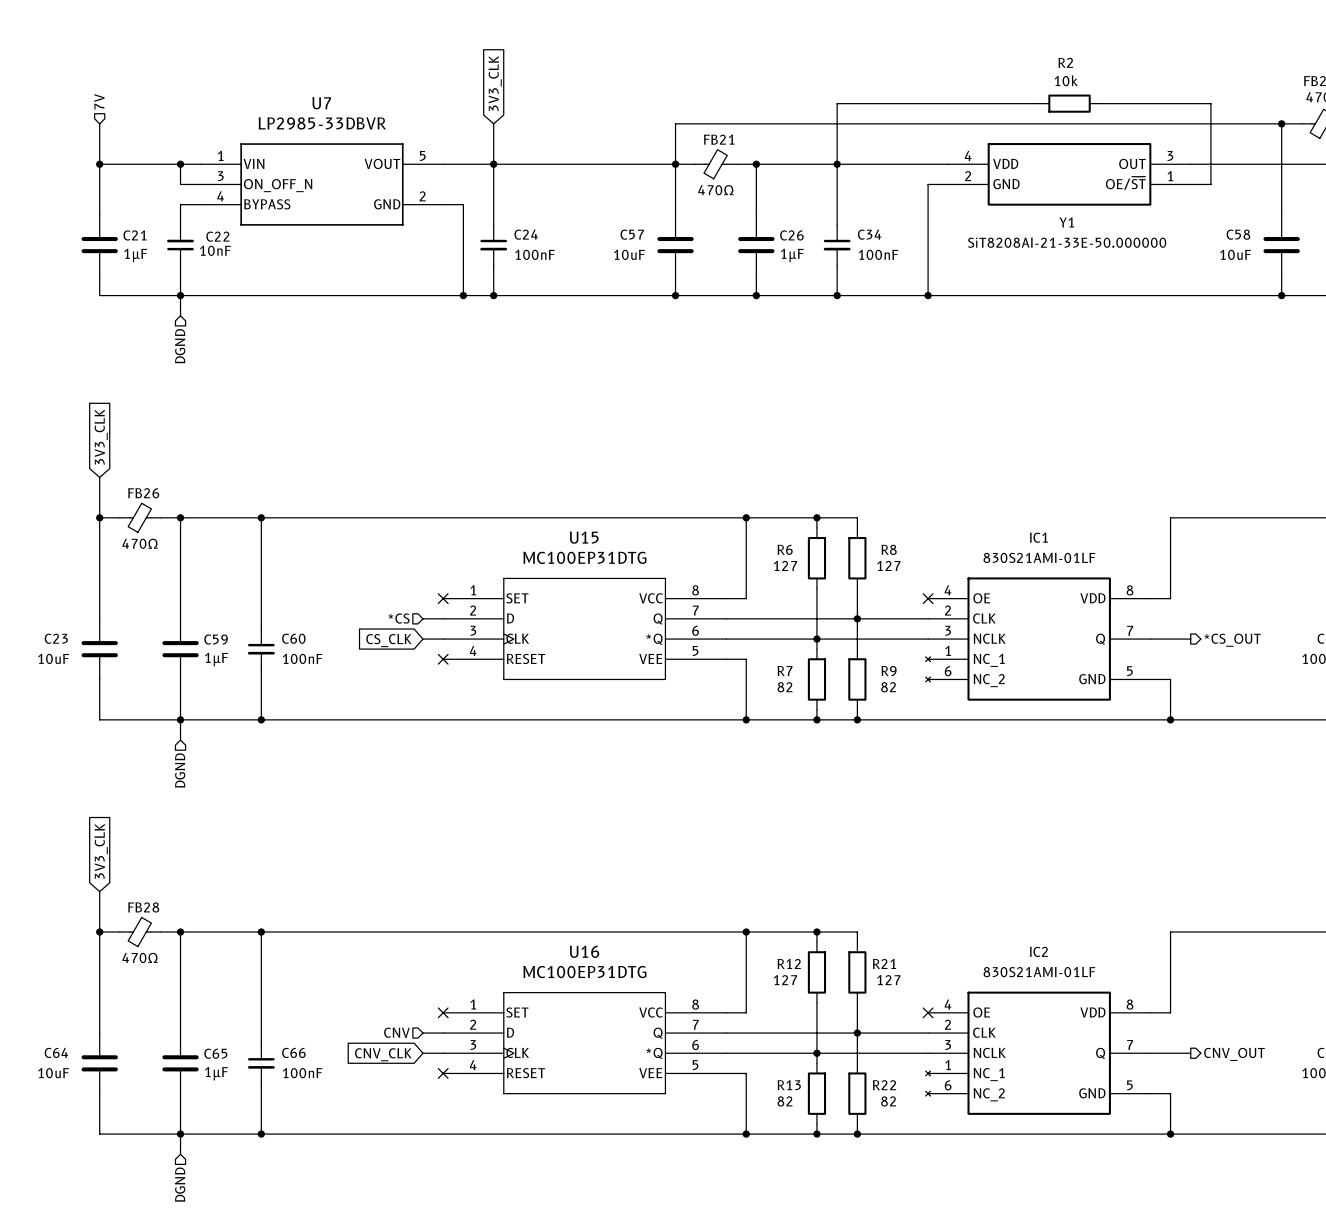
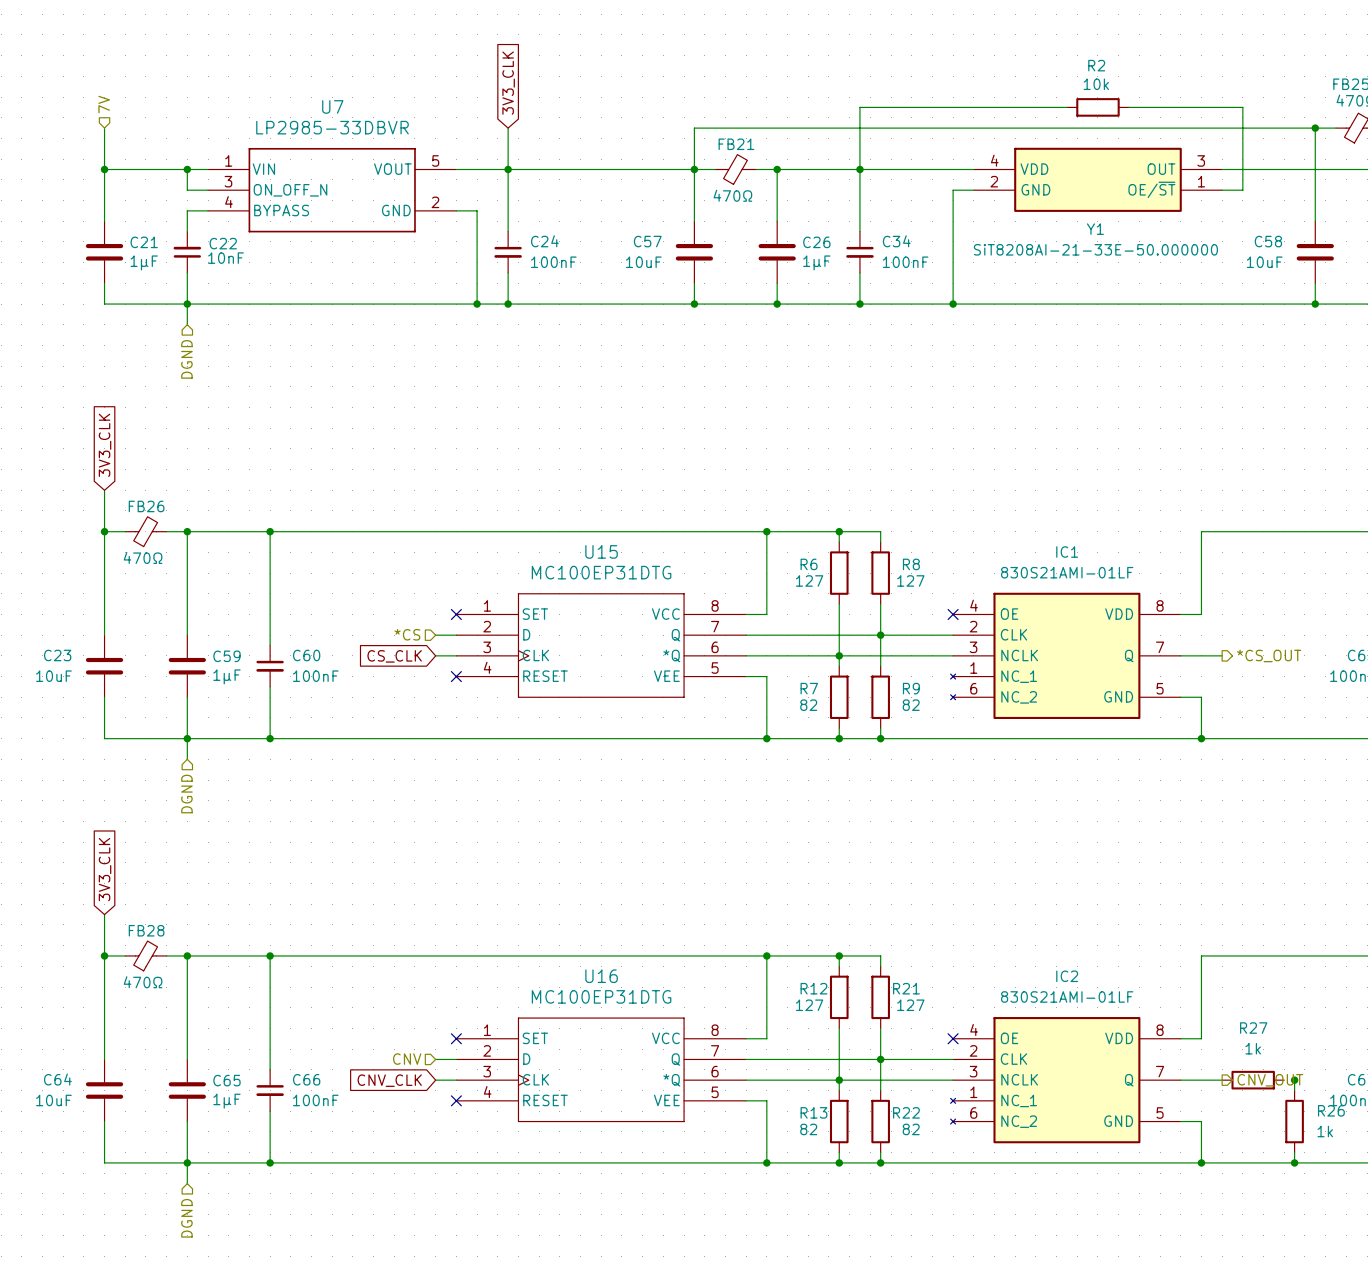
R27: none -> 1k (1253, 1080)
wire: none -> (1294, 1080) (1294, 1090)
junction: none -> (1294, 1080)
R26: none -> 1k (1294, 1121)
wire: none -> (1294, 1152) (1294, 1162)
junction: none -> (1294, 1162)

